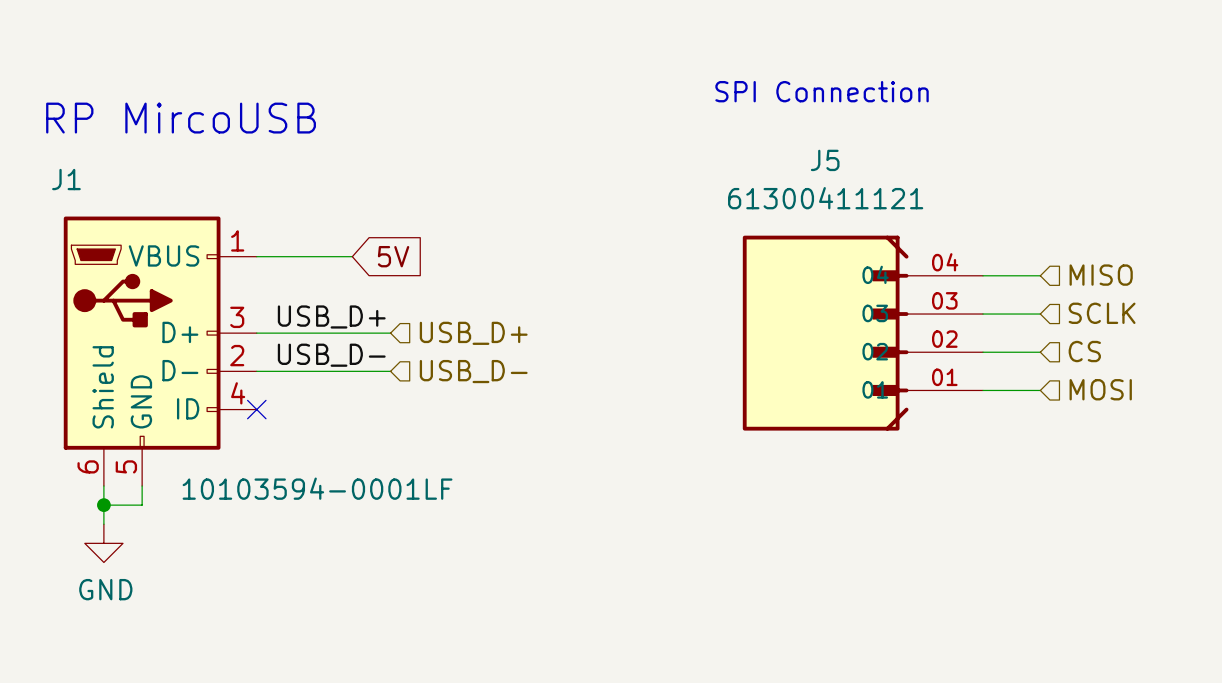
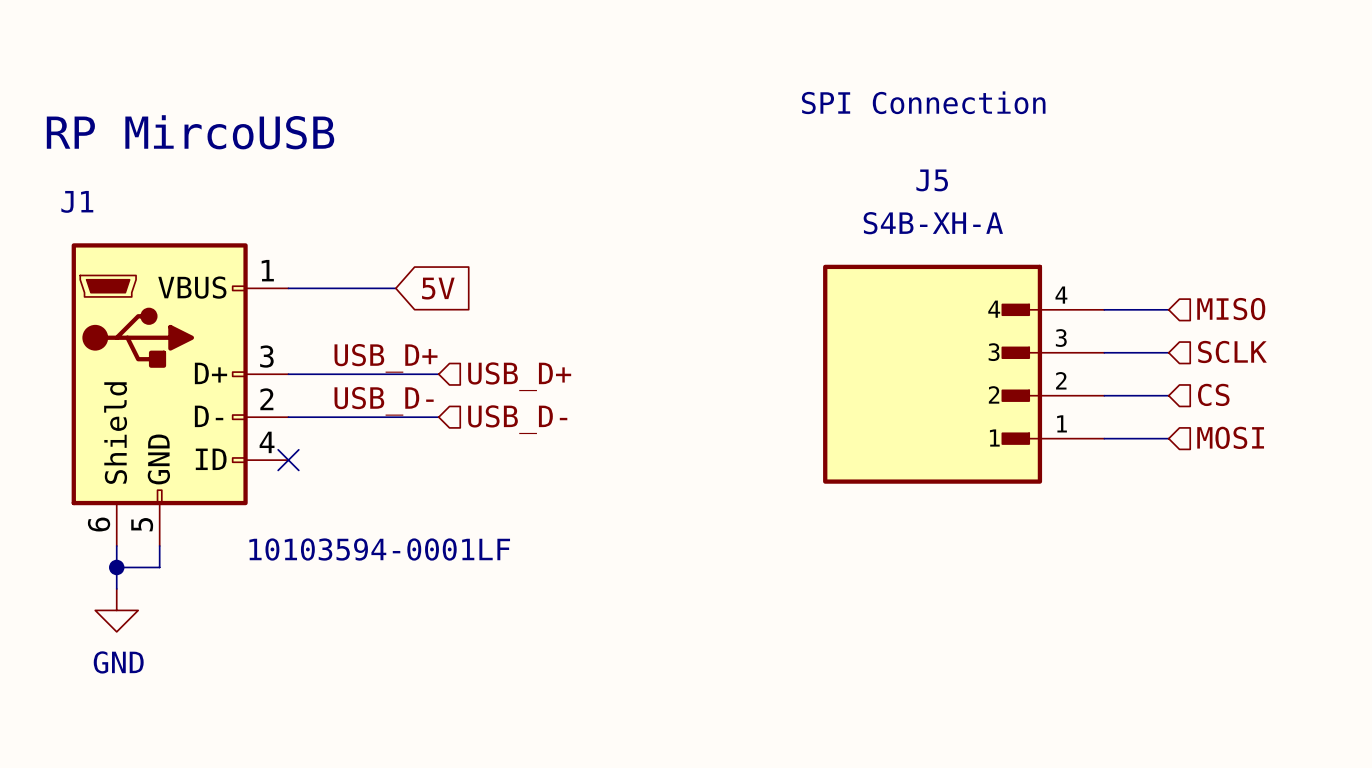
J5 value: 61300411121 (825, 198) -> S4B-XH-A (933, 223)
J5 symbol: [742, 235, 984, 431] -> [823, 264, 1105, 484]

